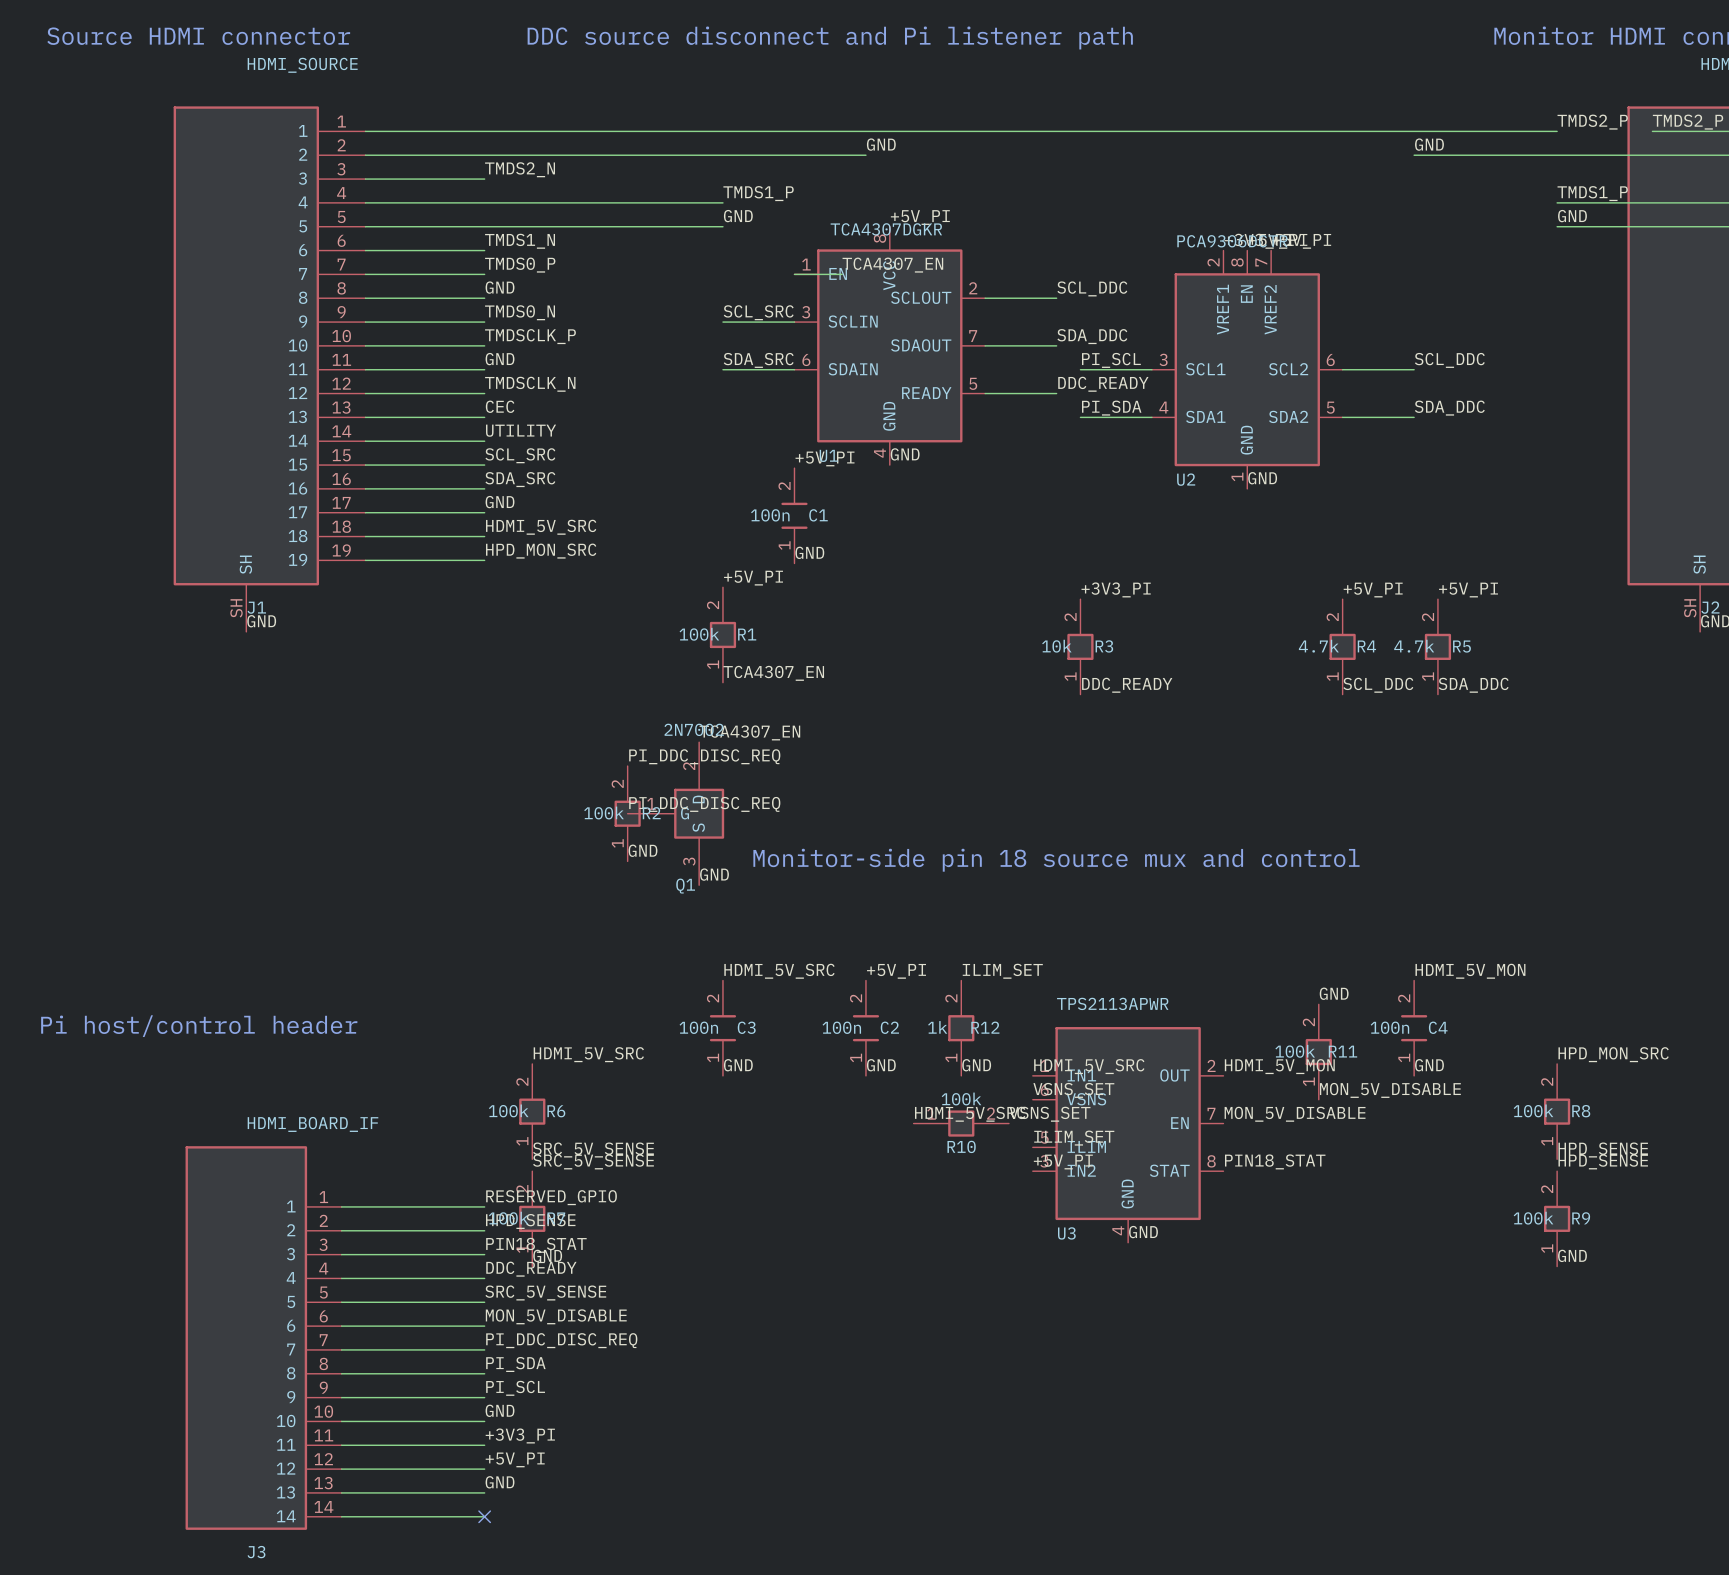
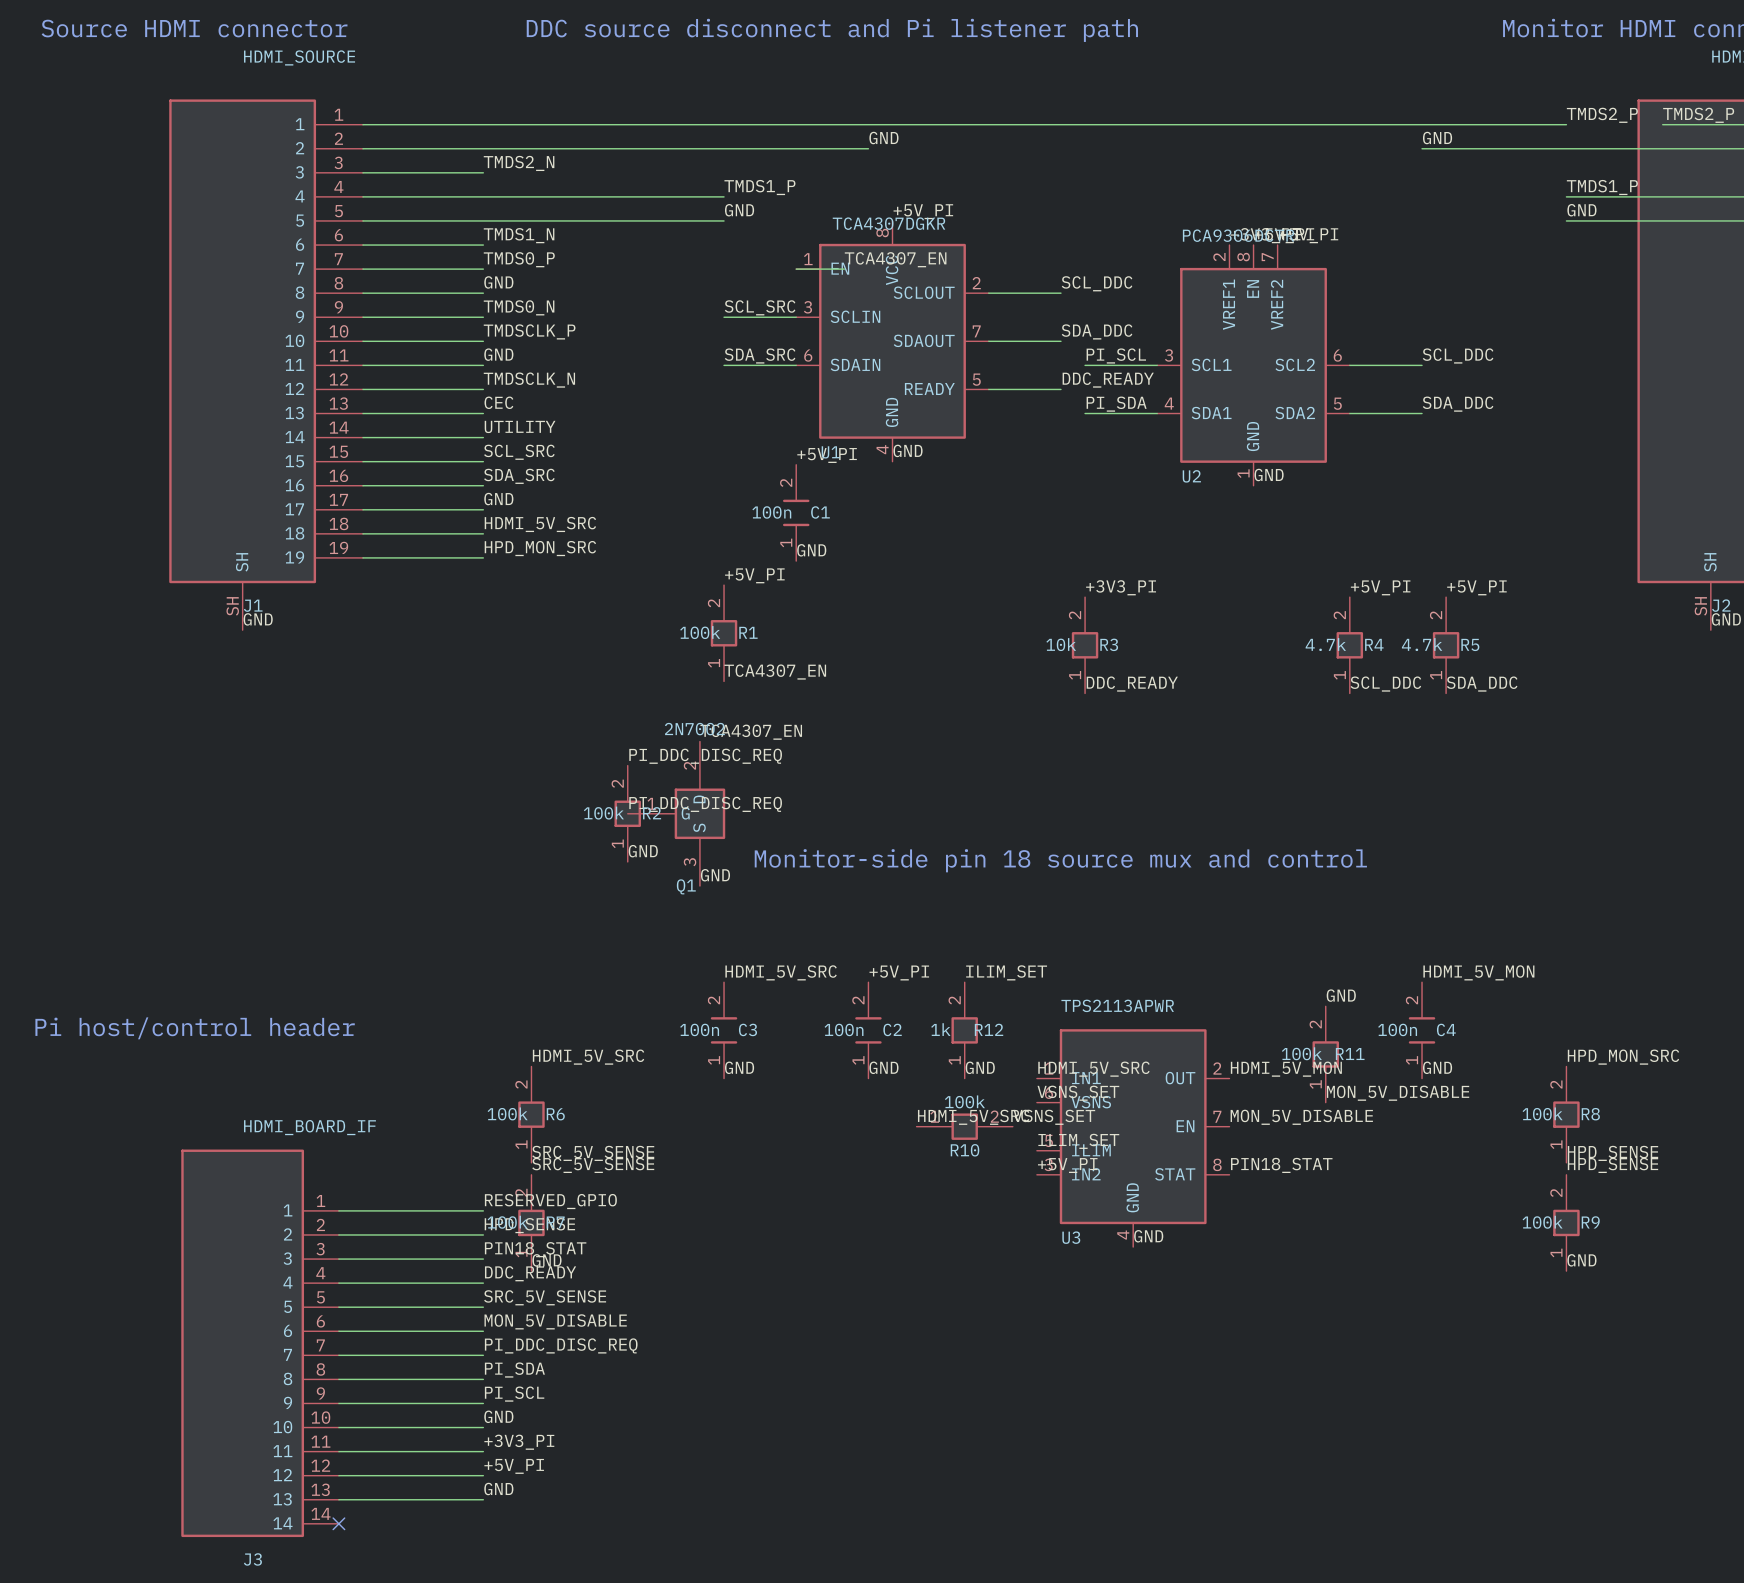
wire: (341, 1516) (484, 1516) -> none
no-connect mark: none -> (338, 1523)
no-connect mark: (484, 1516) -> none

